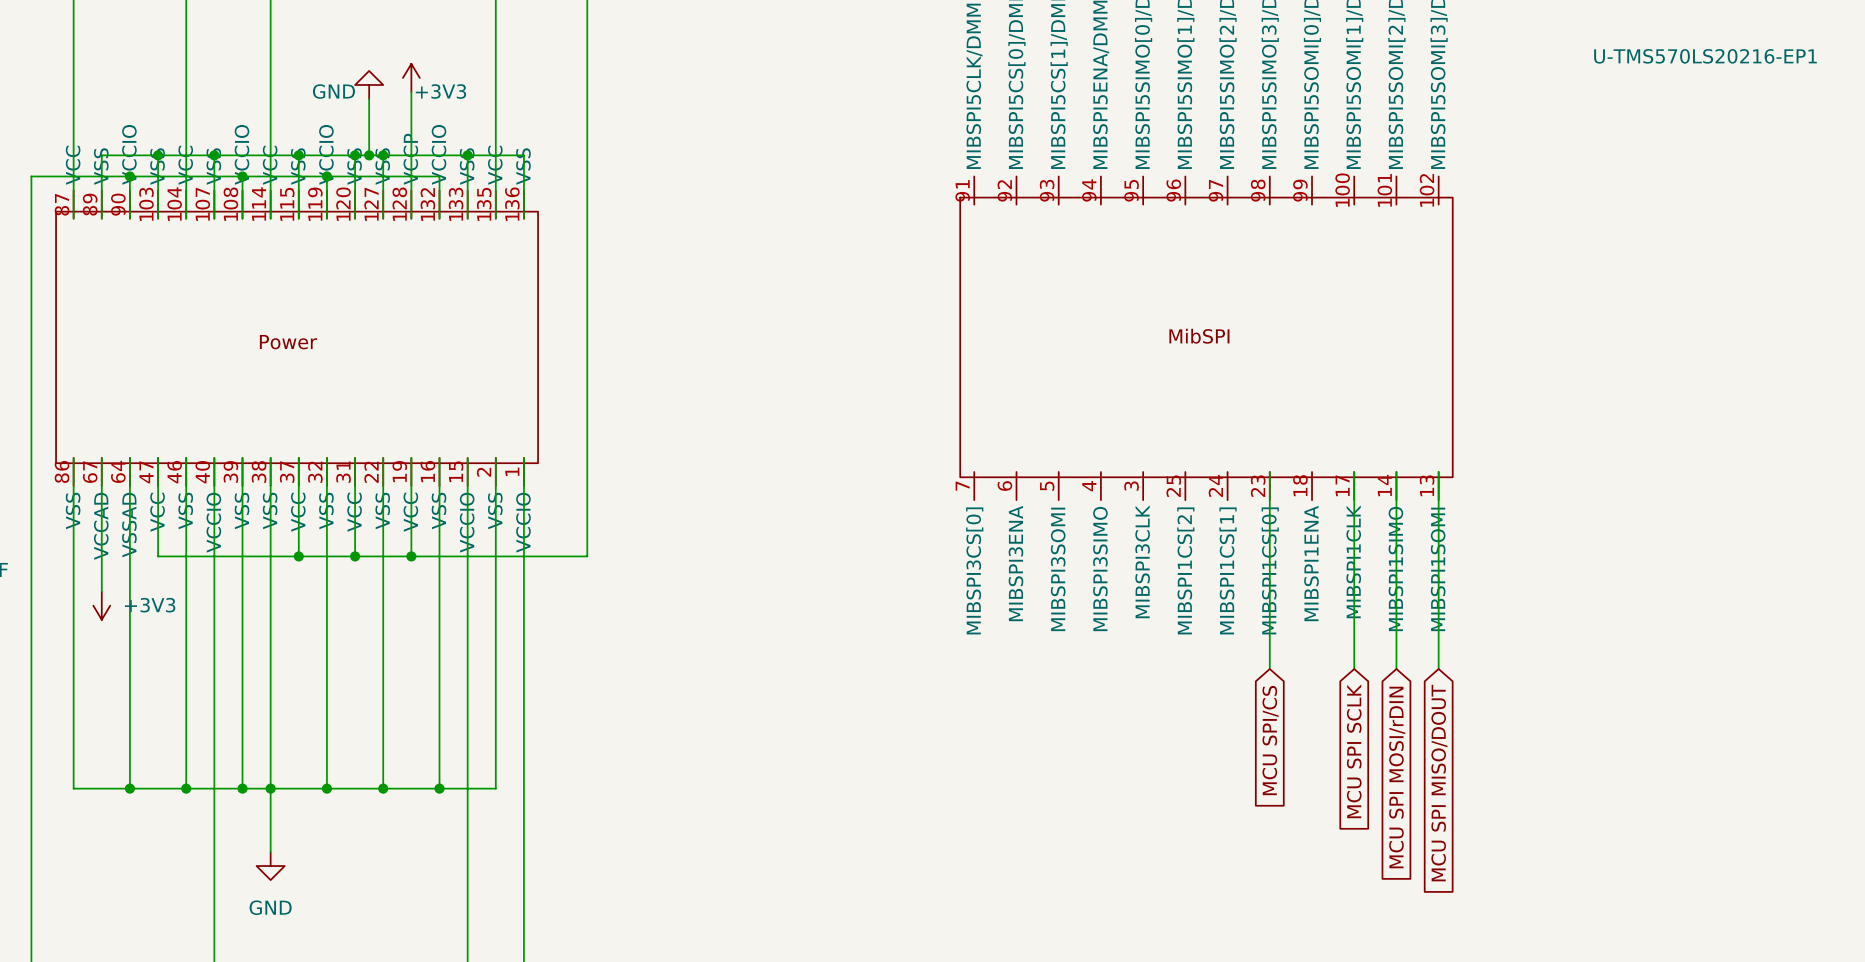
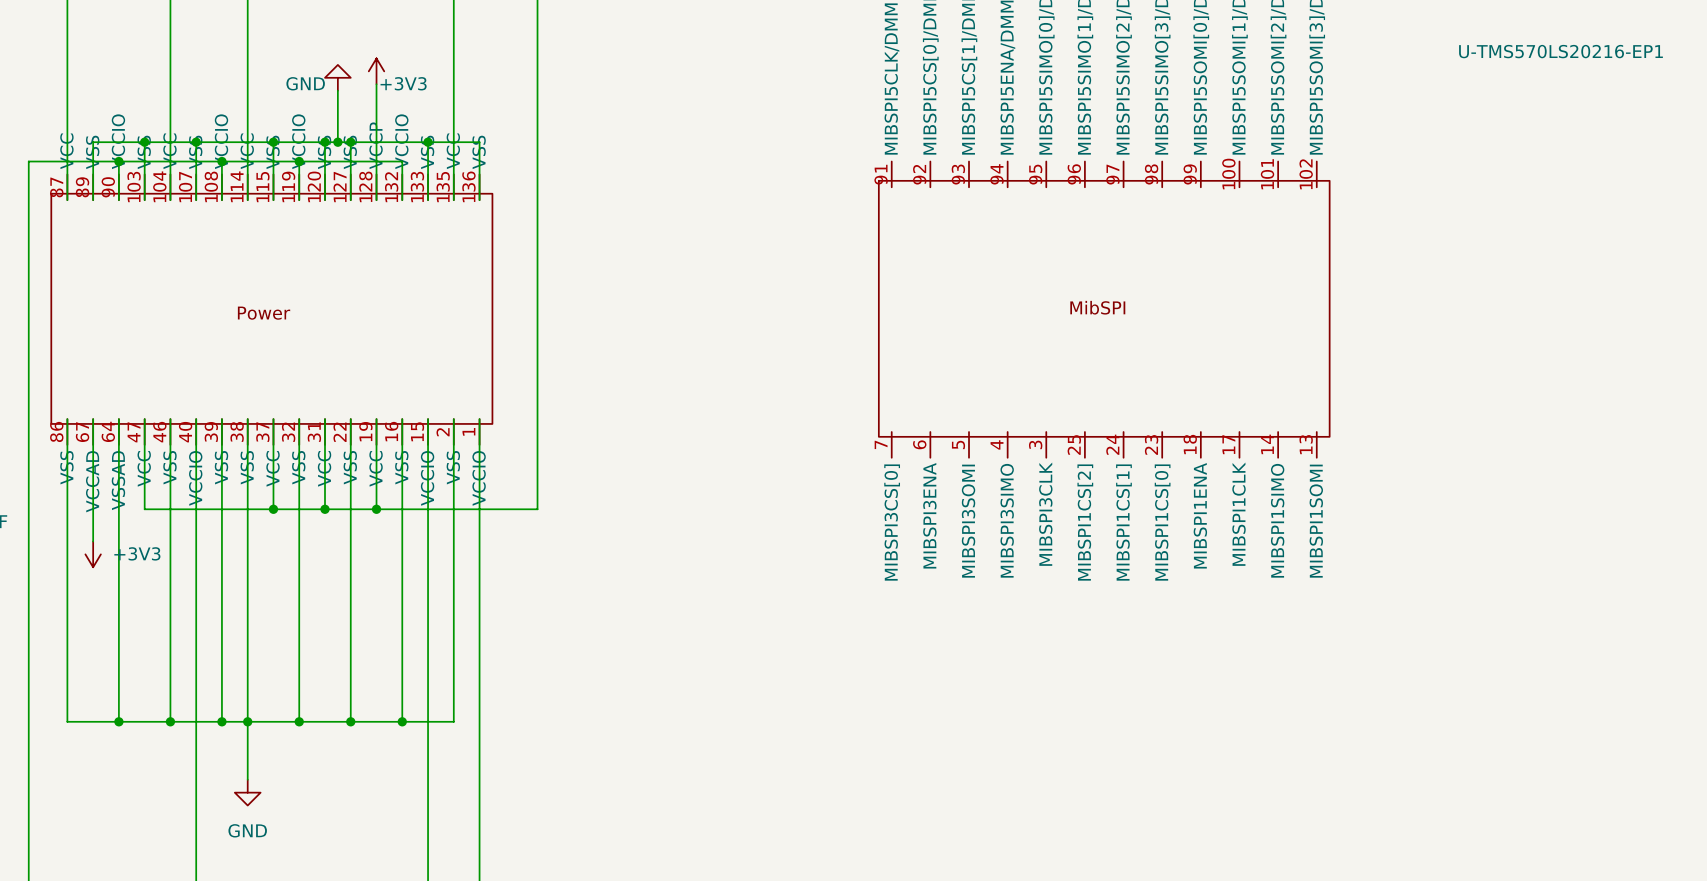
wire: (1269, 471) (1269, 669) -> none
wire: (1354, 471) (1354, 669) -> none
wire: (1396, 471) (1396, 669) -> none
wire: (1438, 471) (1438, 669) -> none
global label: MCU SPI/CS (1270, 740) -> none
global label: MCU SPI SCLK (1354, 751) -> none
global label: MCU SPI MOSI/rDIN (1397, 777) -> none
global label: MCU SPI MISO/DOUT (1439, 783) -> none

